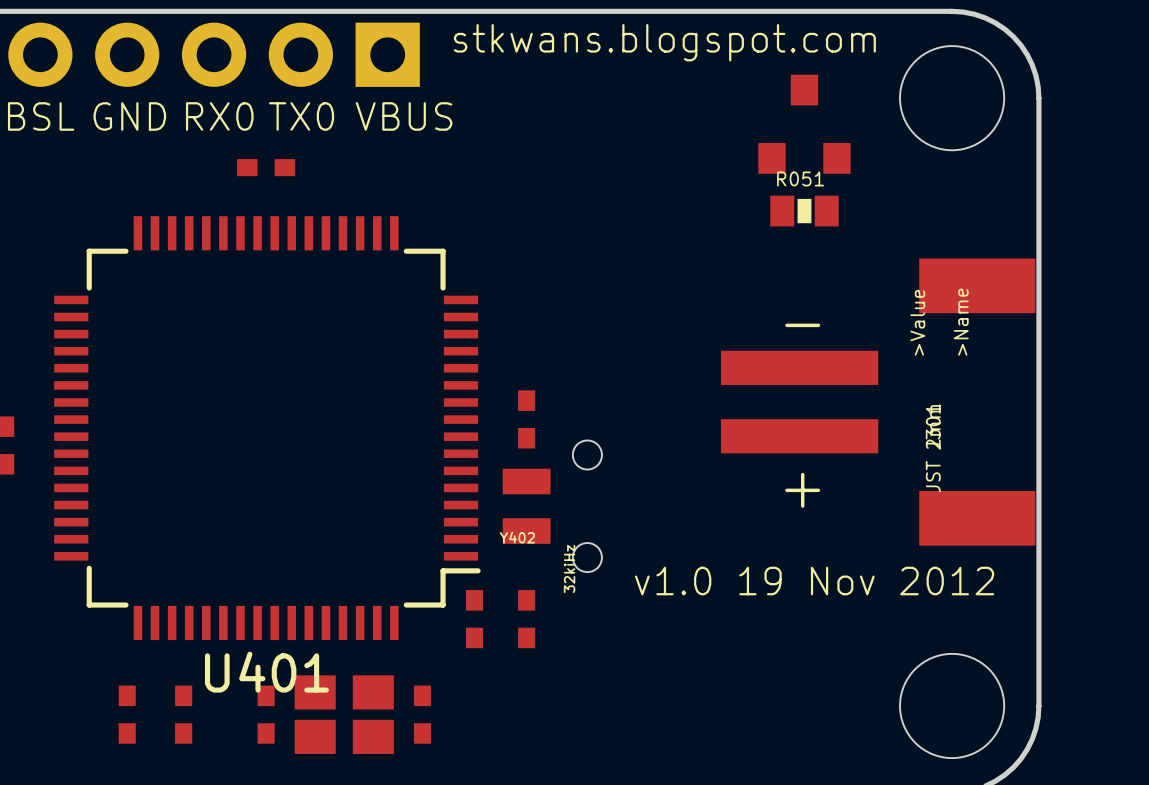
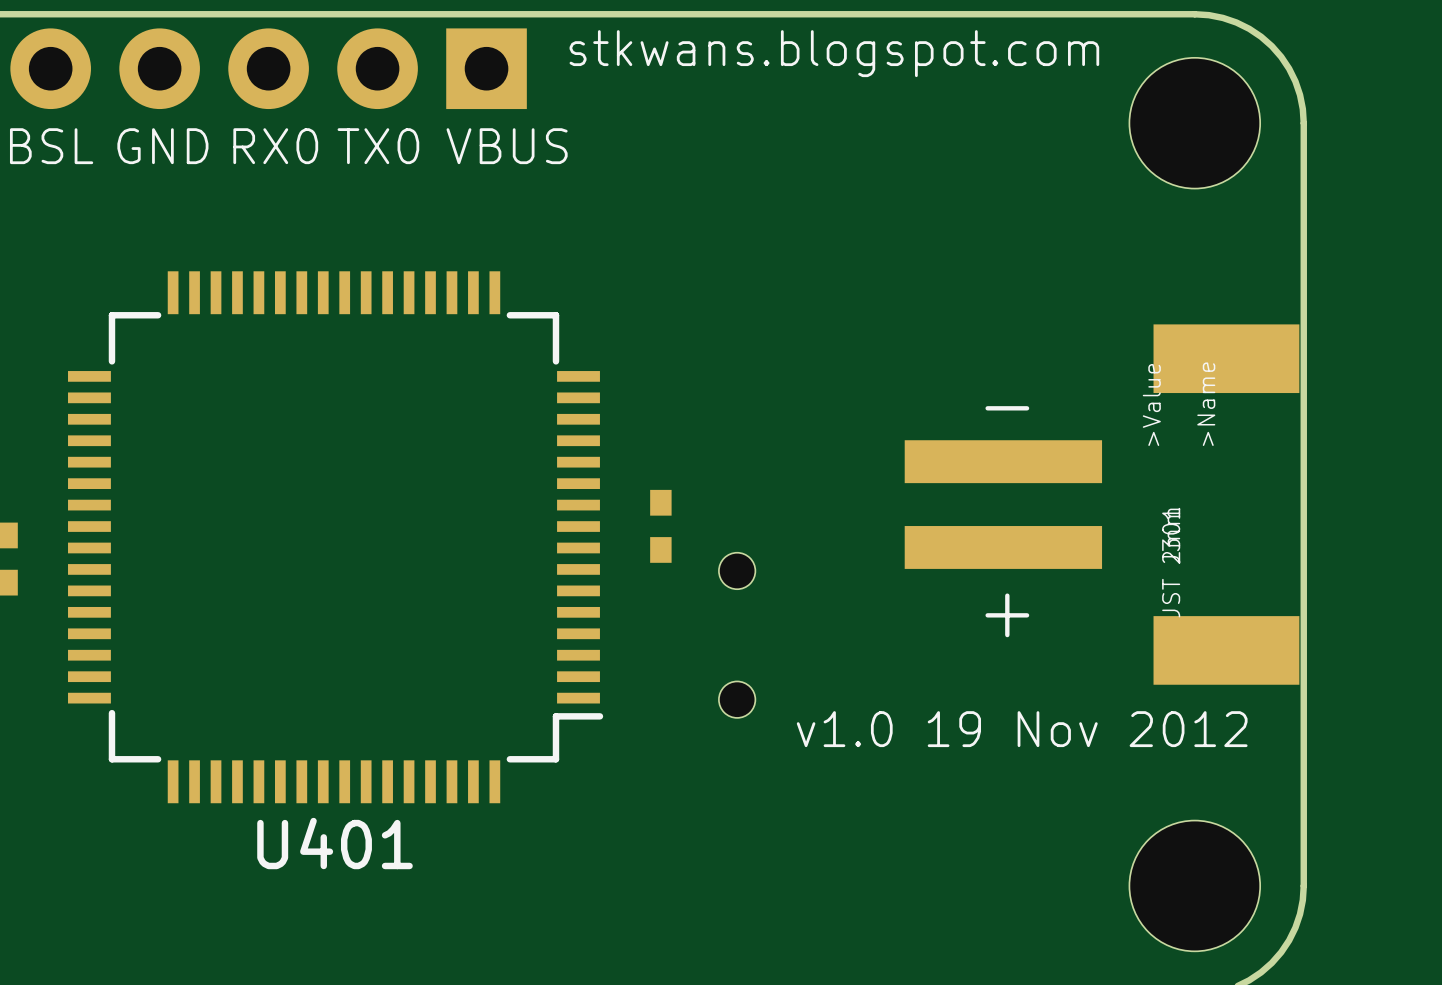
part: (804, 124) -> none
part: (266, 167) -> none
R051: (804, 211) -> none
Y402: 32kiHz (526, 506) -> none
part: (474, 619) -> none
part: (526, 619) -> none
part: (127, 714) -> none
part: (183, 714) -> none
part: (266, 714) -> none
part: (344, 714) -> none
part: (422, 714) -> none

